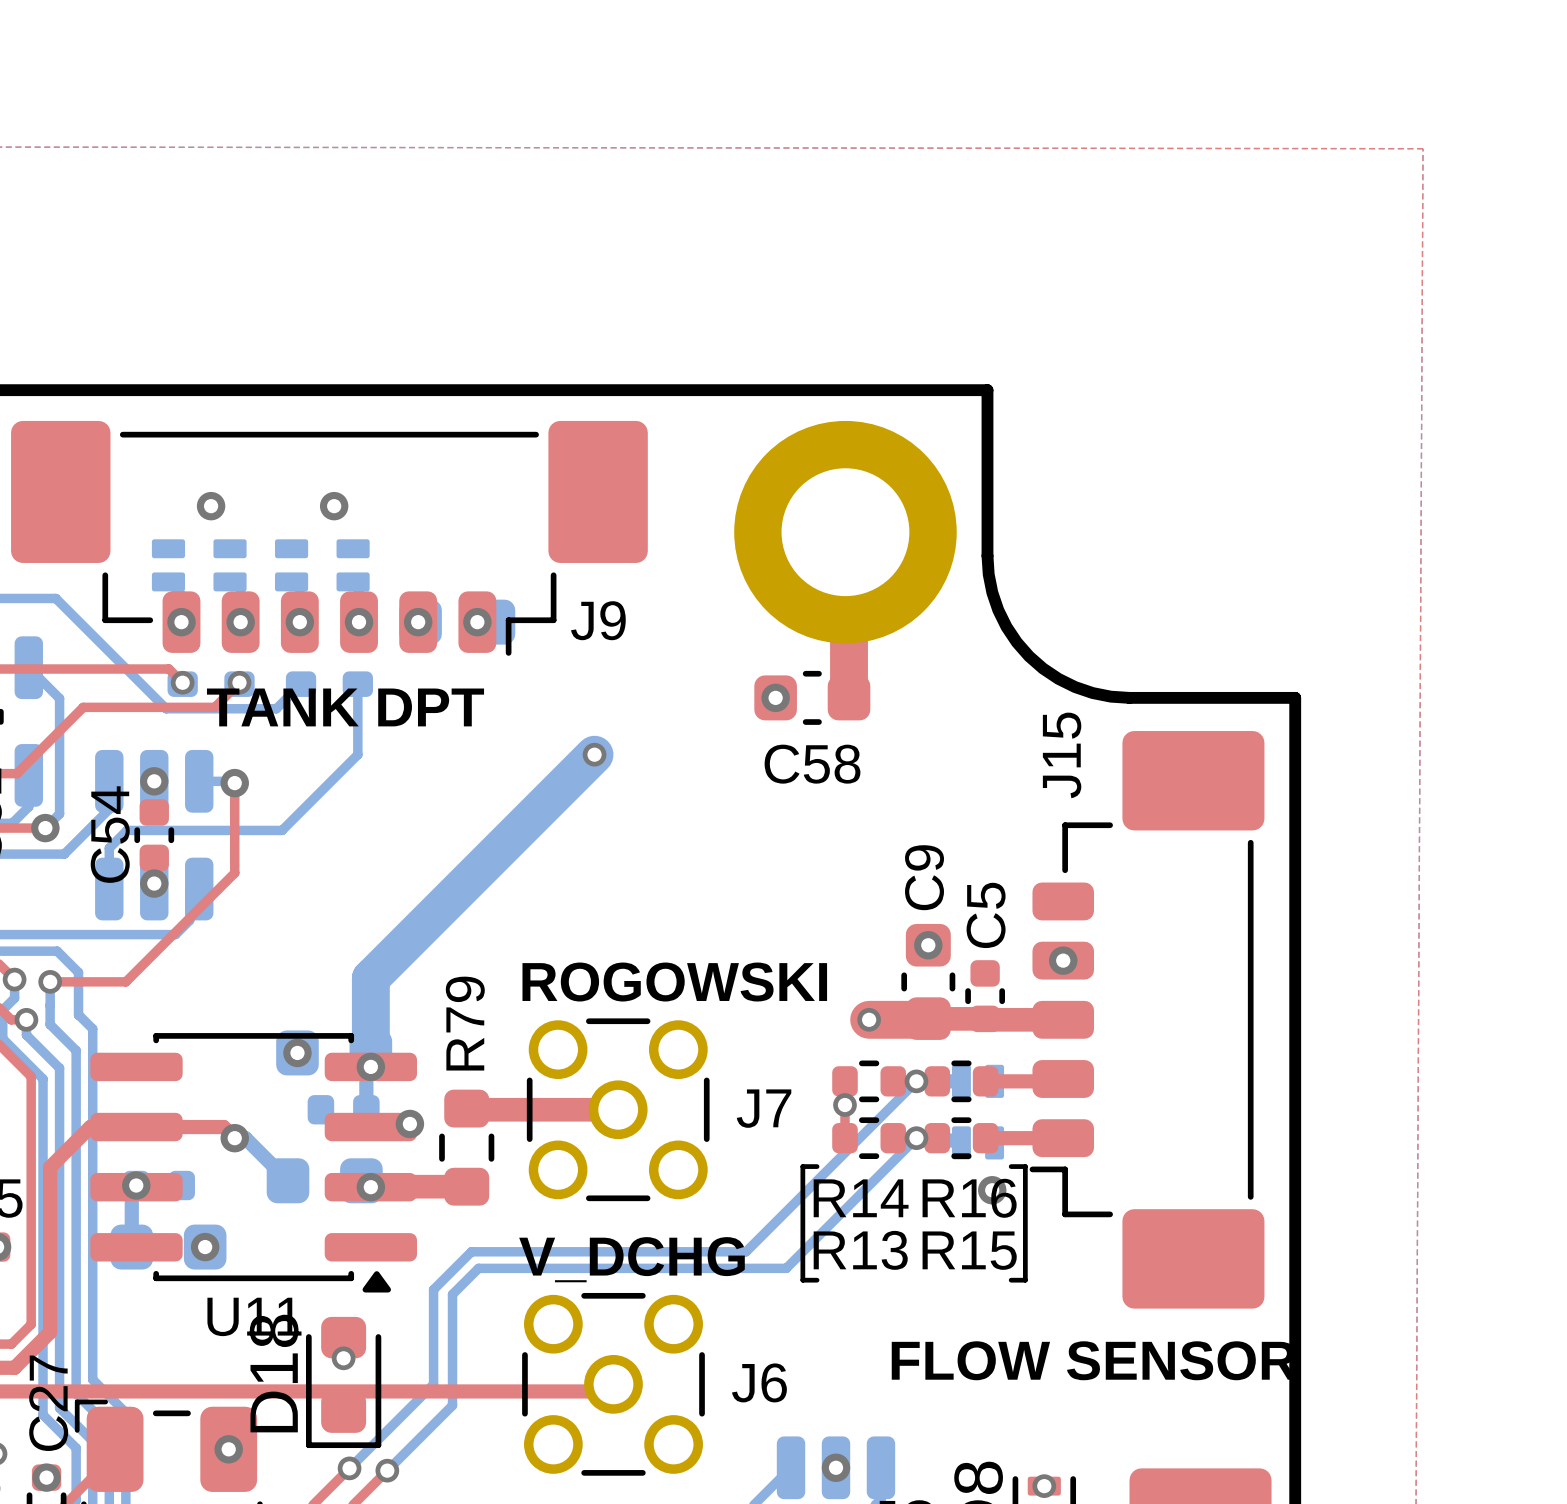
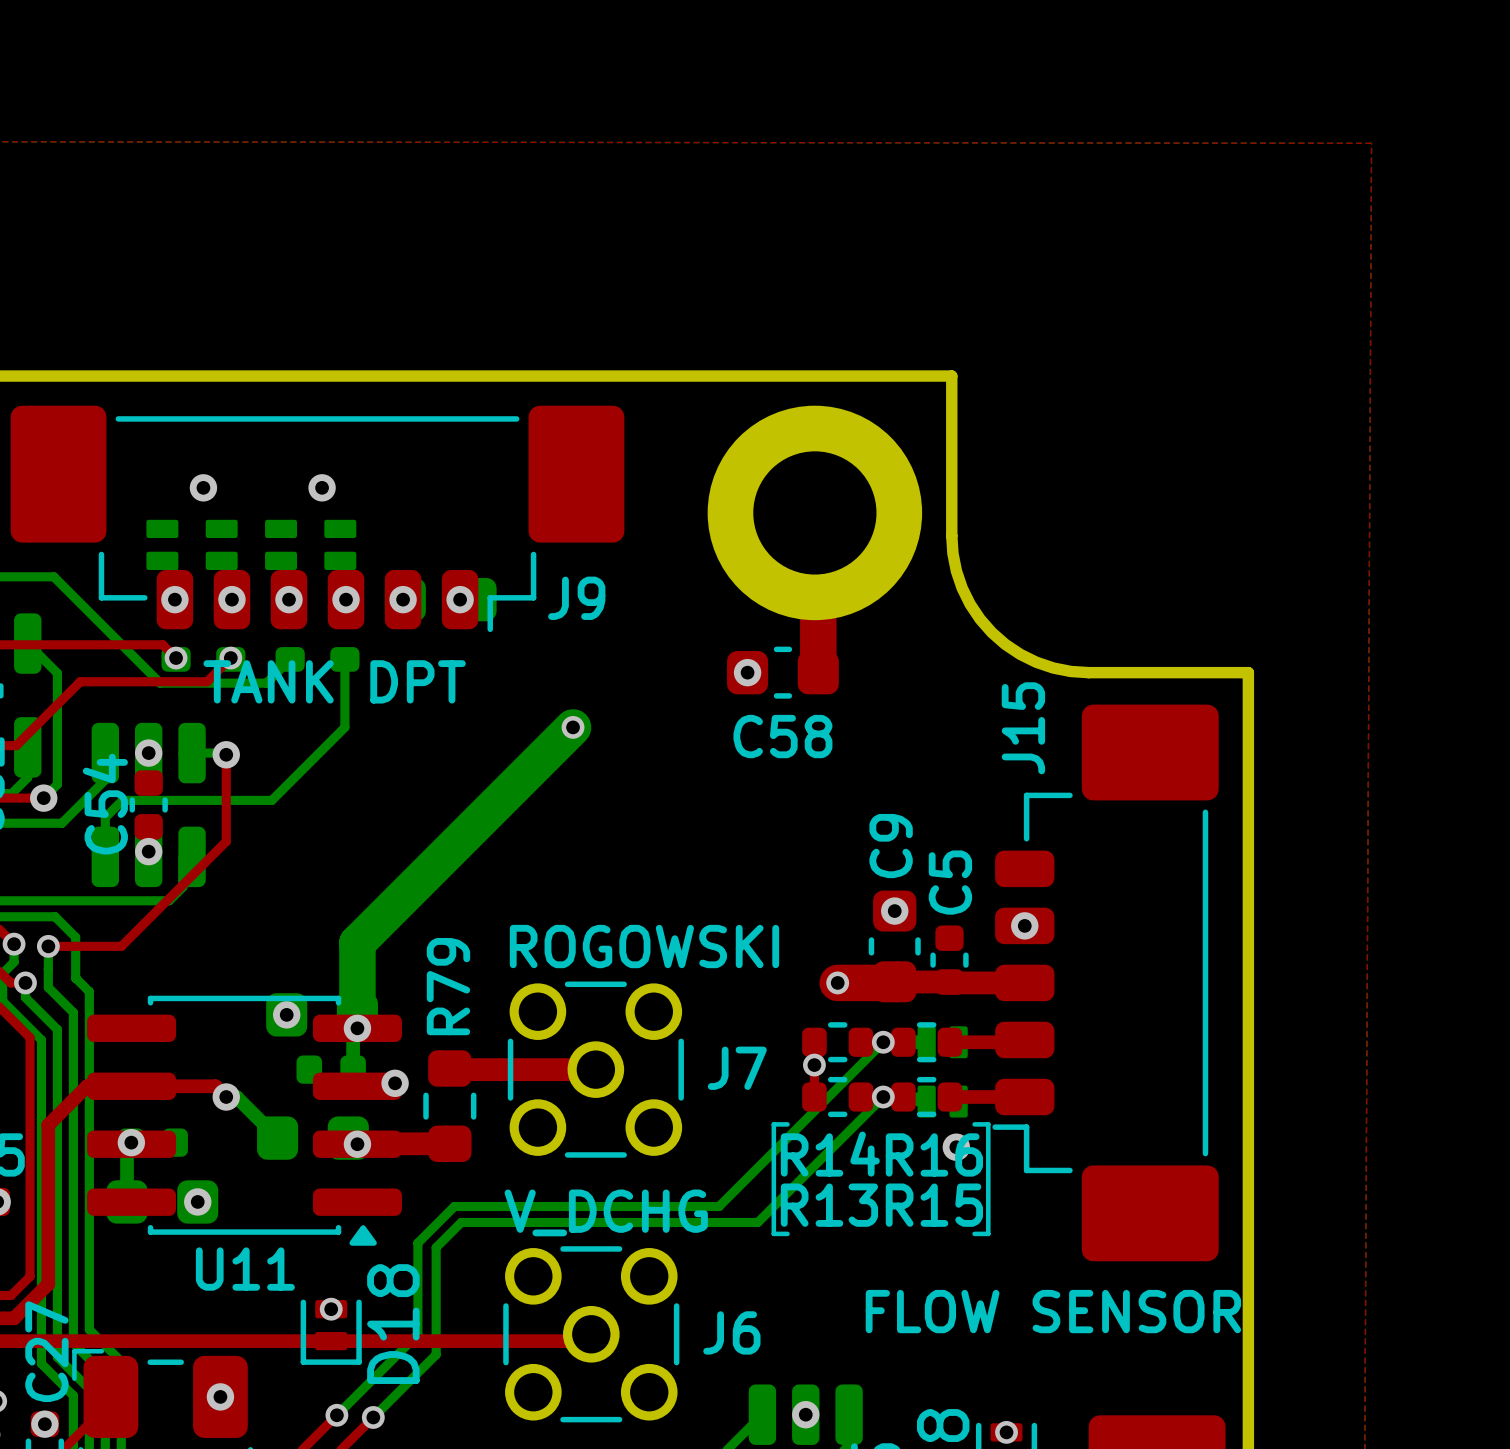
D18 footprint: [306, 1316, 382, 1449] -> [300, 1299, 362, 1365]
D18 name position: D18 (274, 1373) -> D18 (393, 1324)

